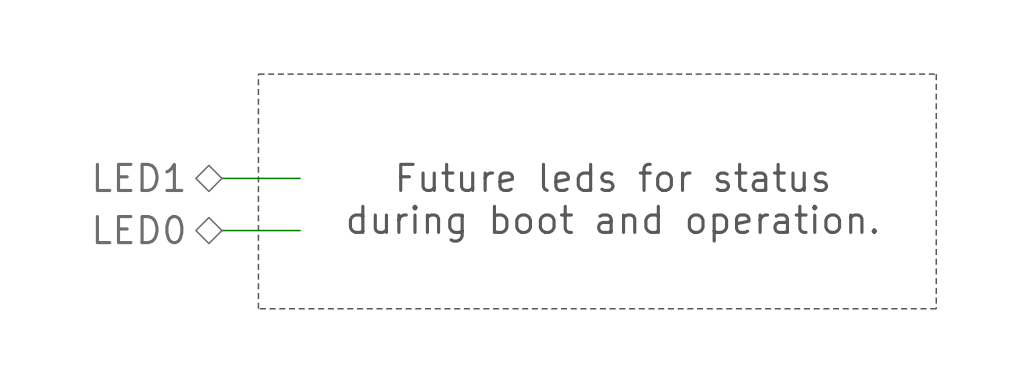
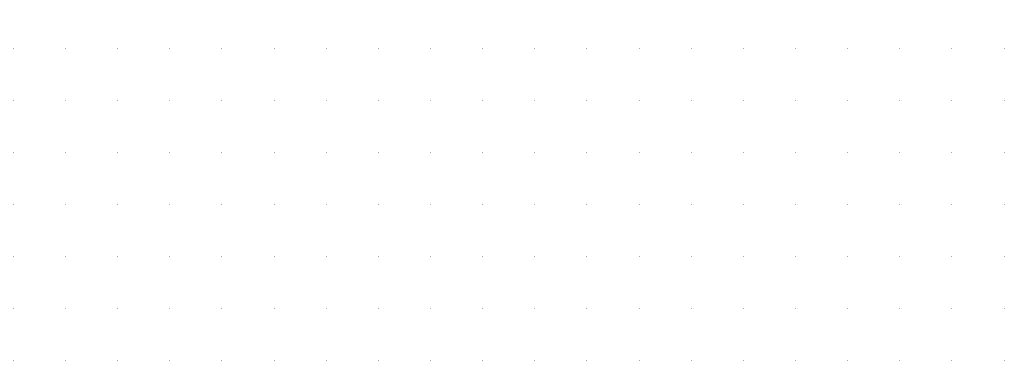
line: (258, 74) (936, 74) (936, 308) (258, 308) (258, 74) -> none
hierarchical label: LED1 (139, 177) -> none
text: Future leds for status (613, 177) -> none
wire: (221, 178) (300, 178) -> none
text: during boot and operation. (613, 223) -> none
hierarchical label: LED0 (139, 229) -> none
wire: (221, 230) (300, 230) -> none

